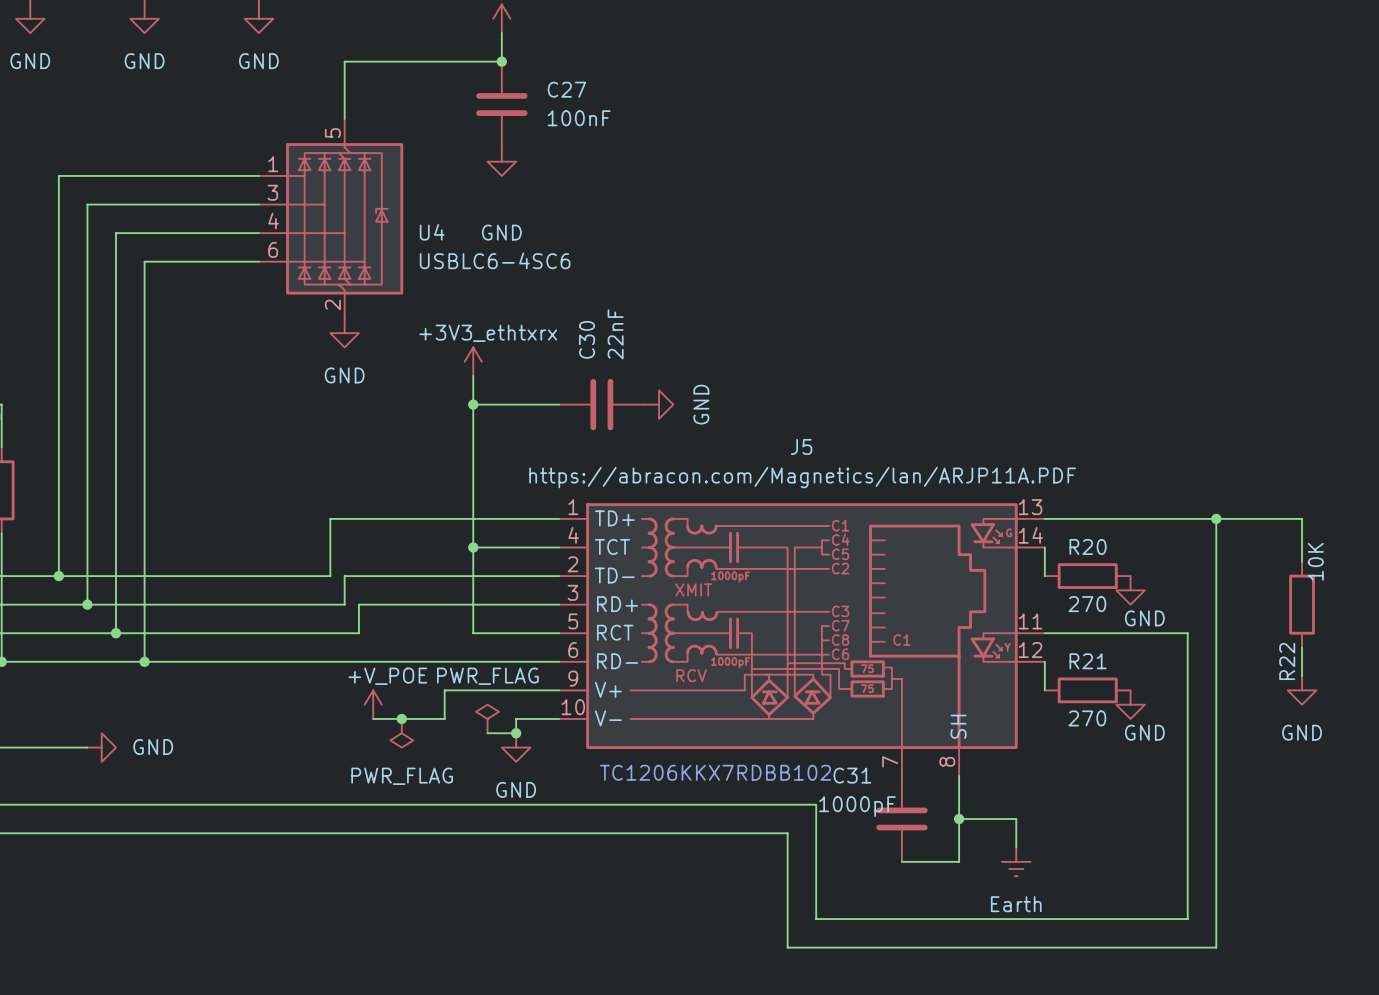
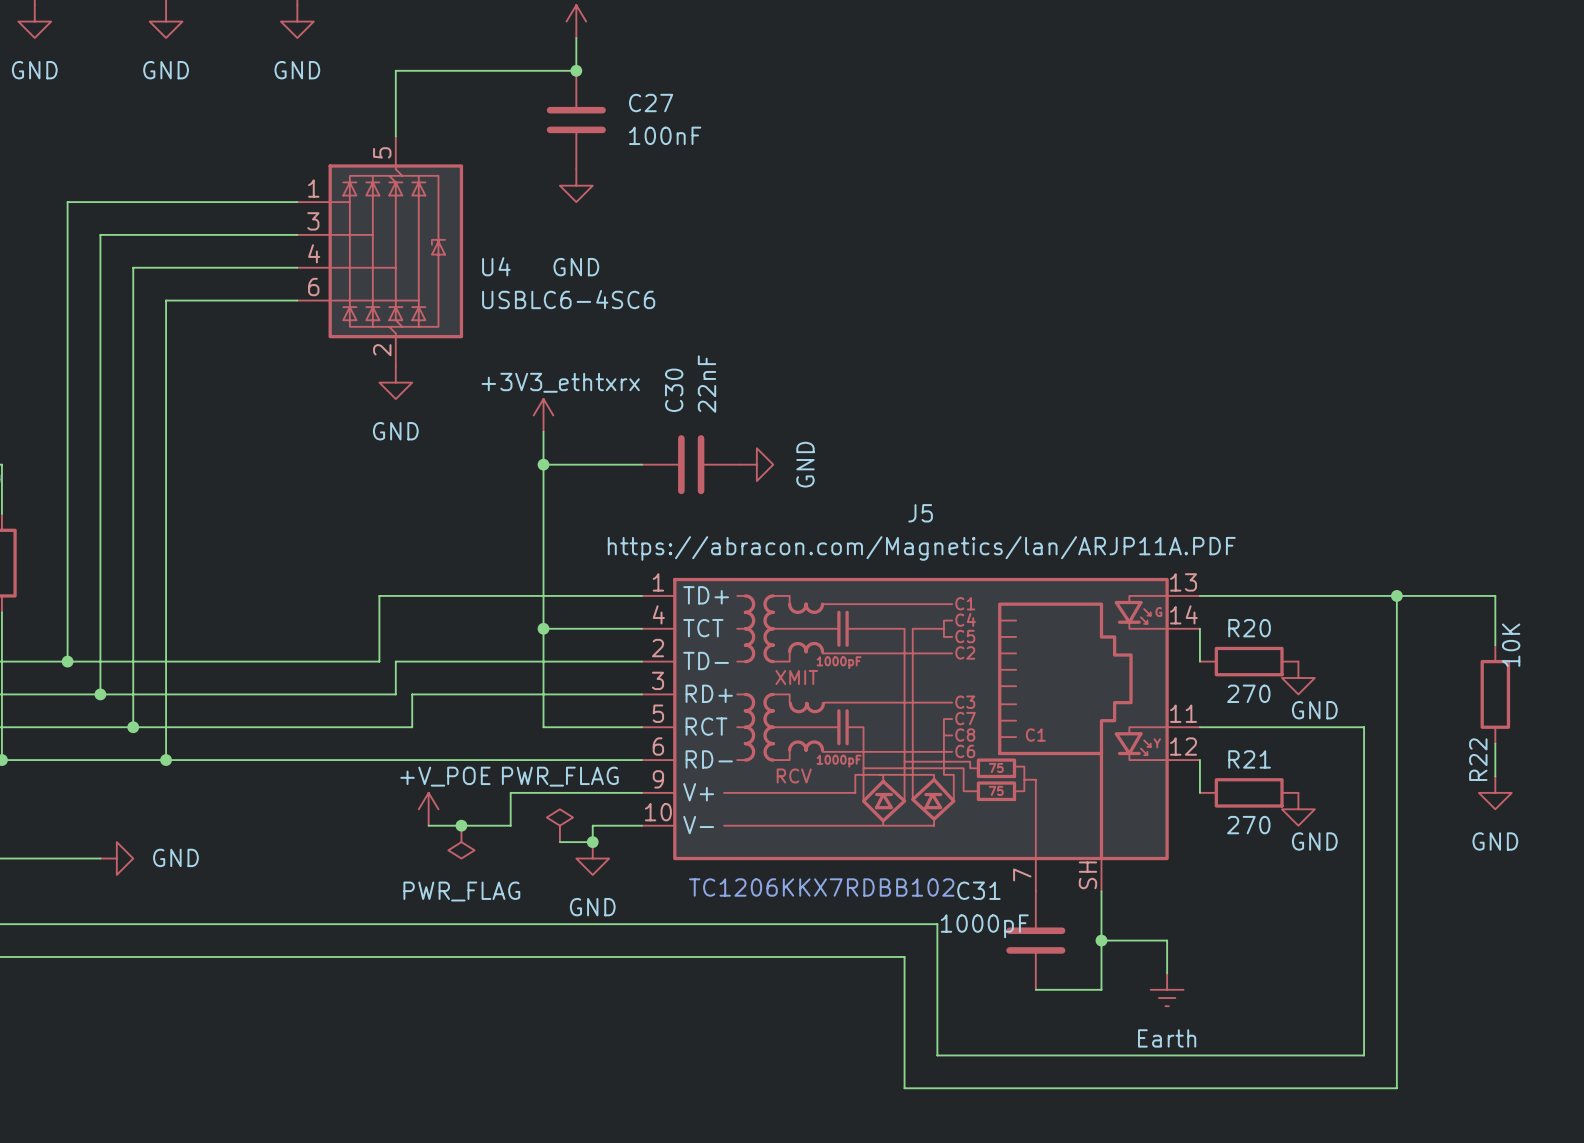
J5 pin name: SH (958, 726) -> none
J5 pin number: 8 (947, 761) -> SH (1087, 875)

